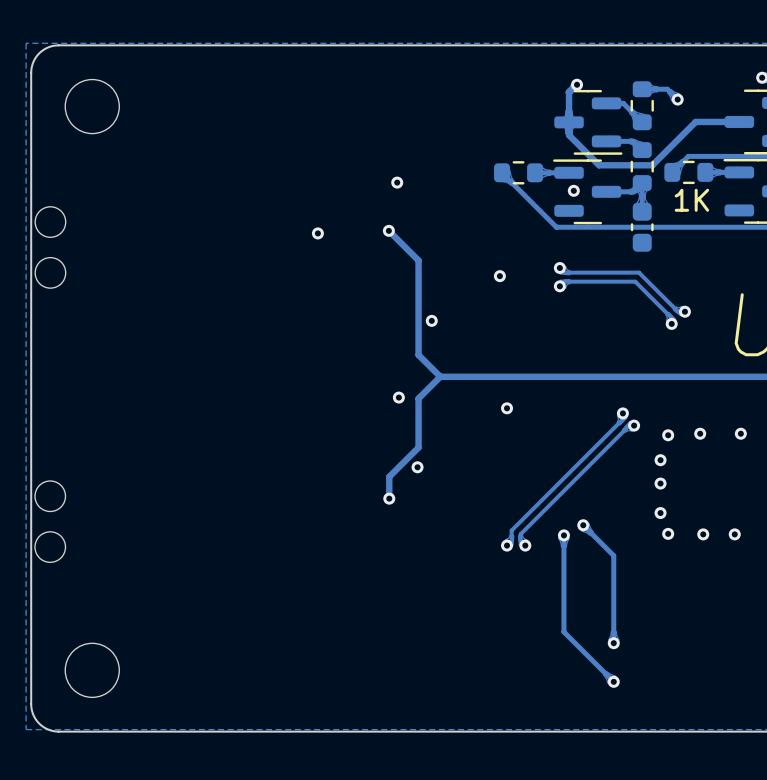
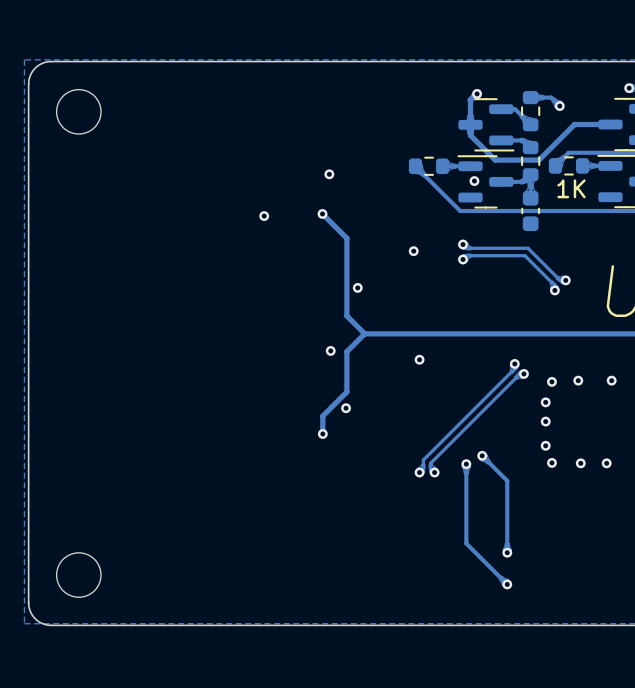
part: (50, 247) -> none
part: (50, 521) -> none

